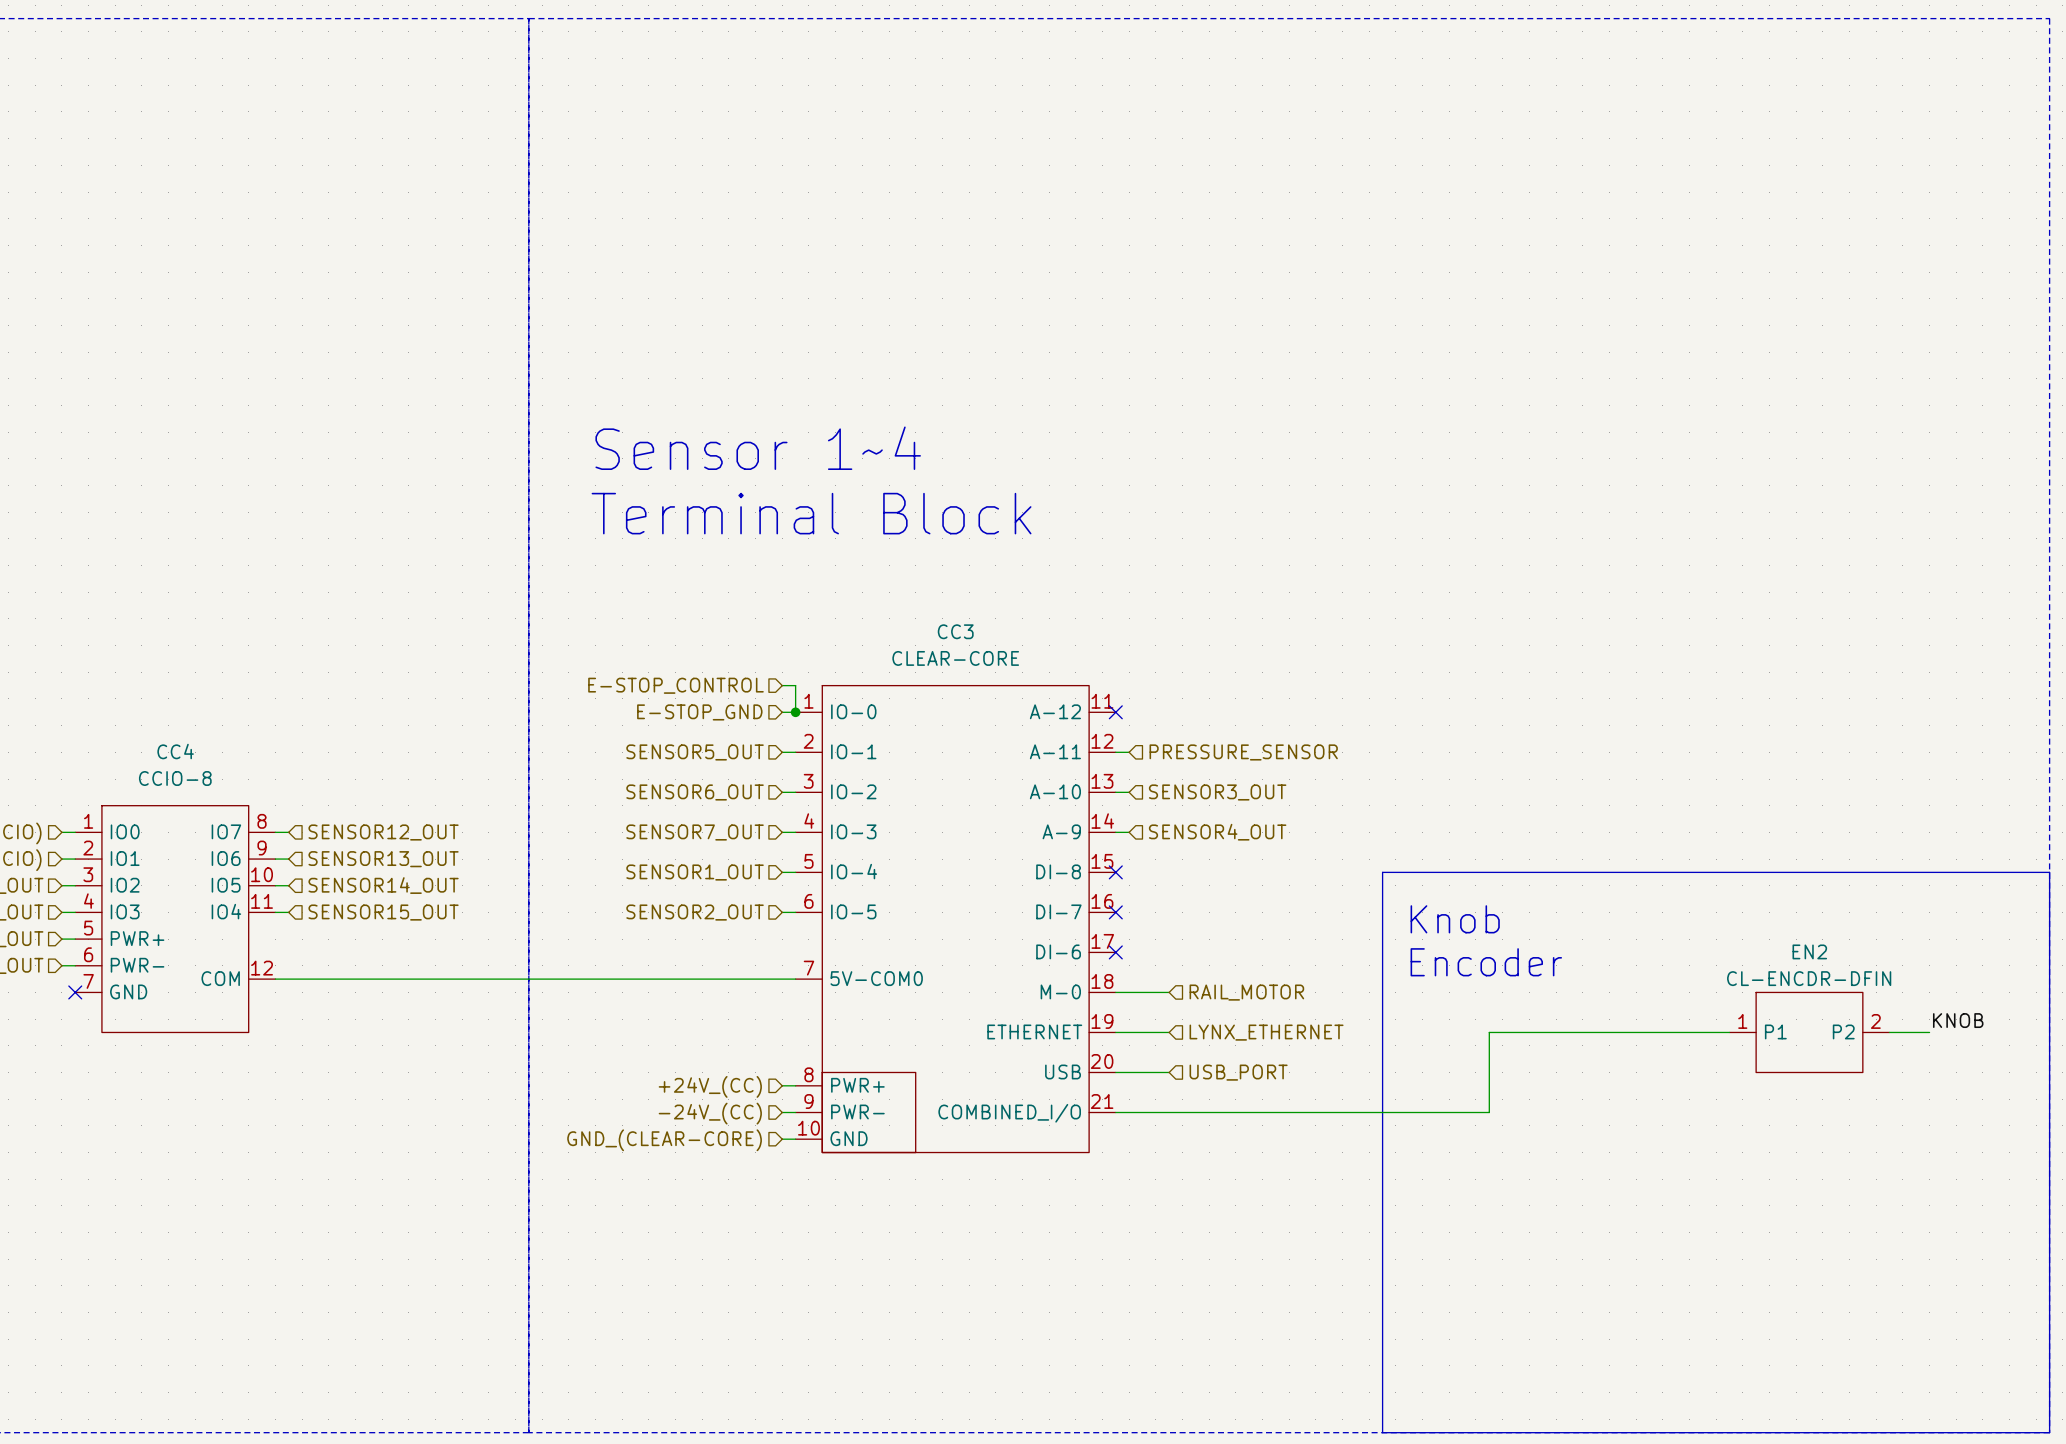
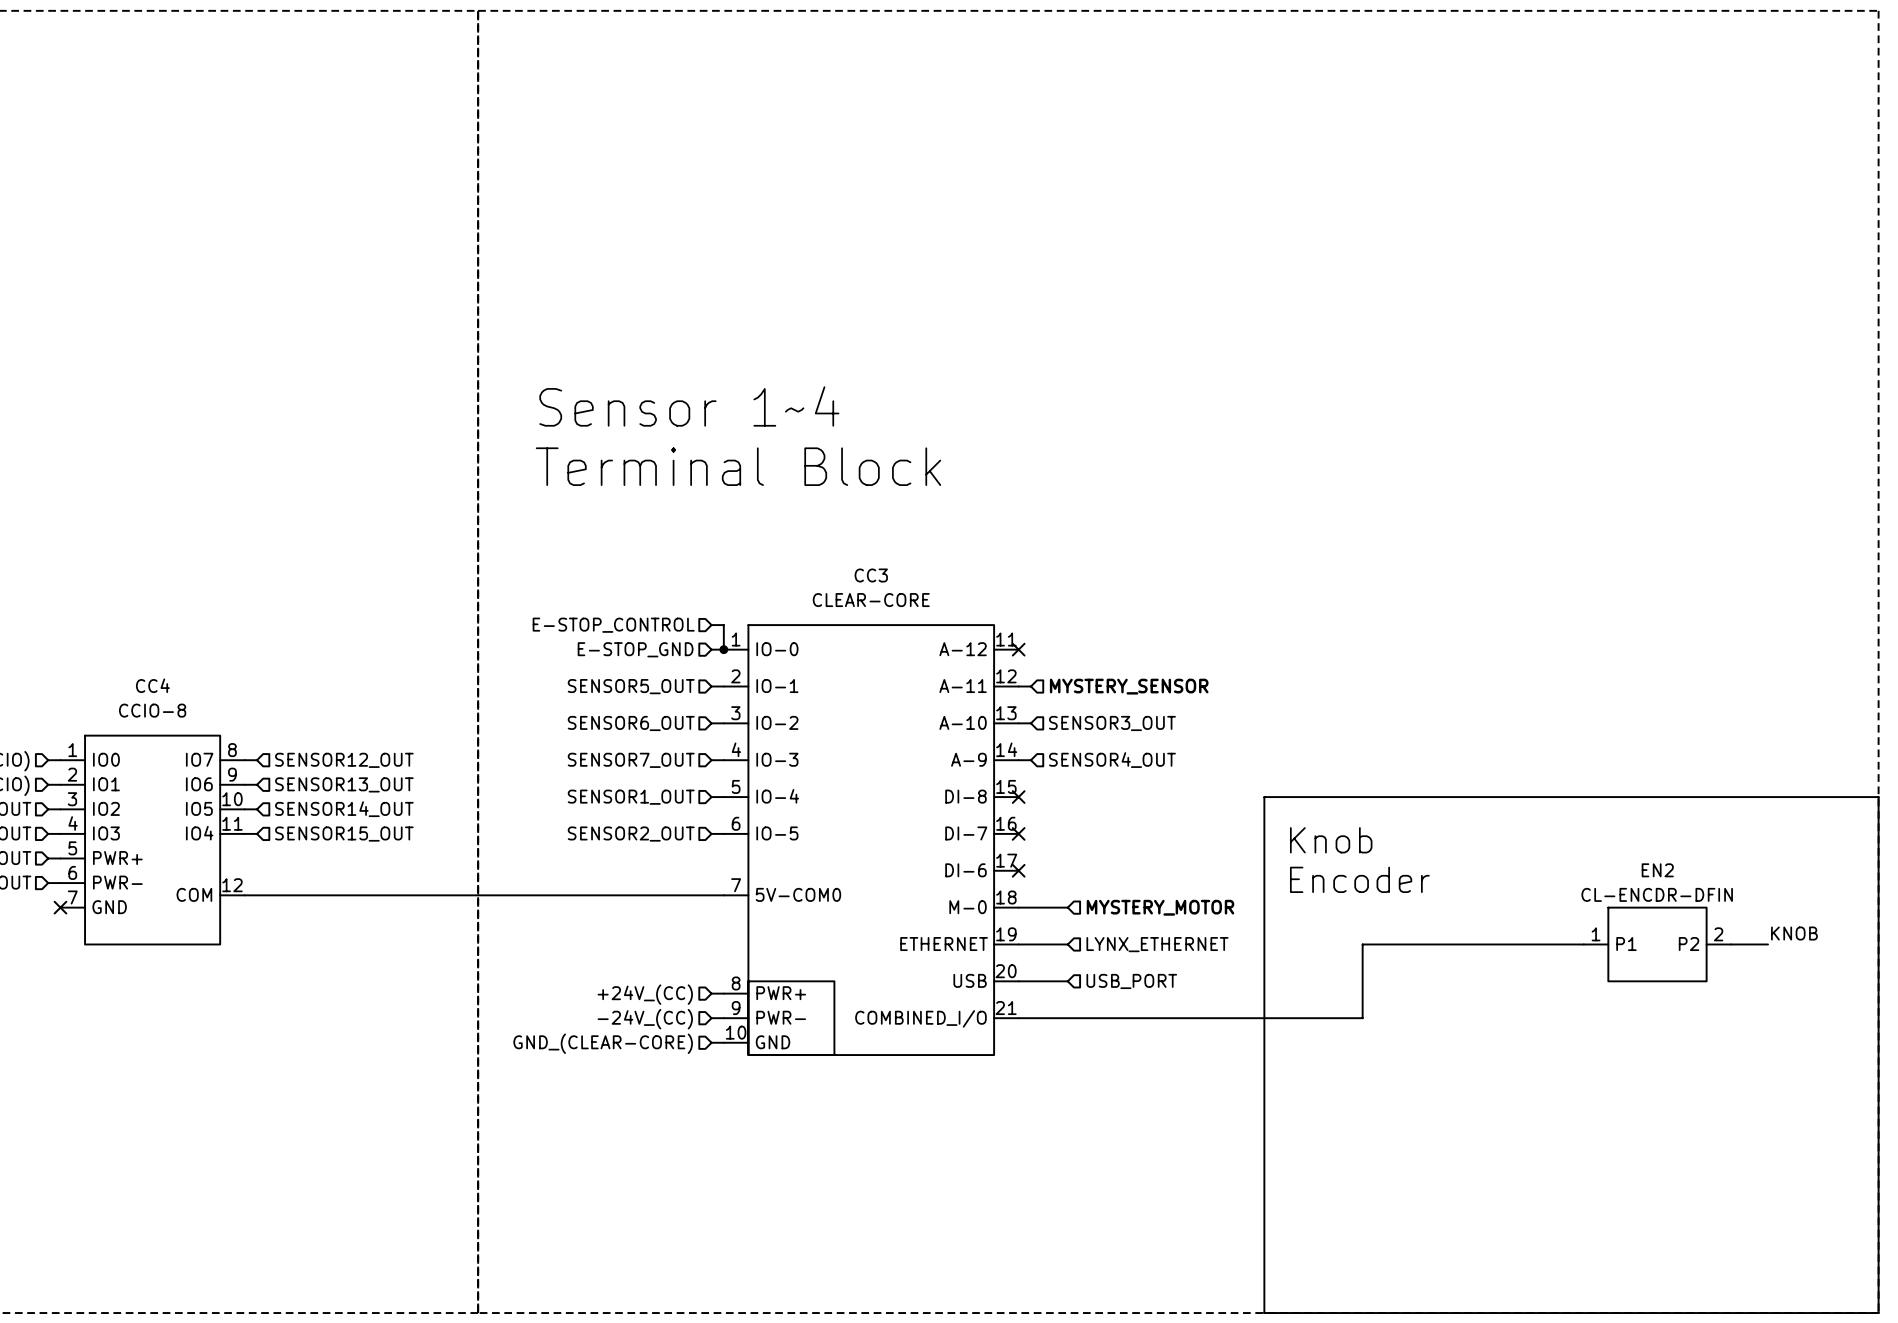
hierarchical label: PRESSURE_SENSOR (1243, 752) -> MYSTERY_SENSOR (1129, 686)
hierarchical label: RAIL_MOTOR (1246, 992) -> MYSTERY_MOTOR (1160, 907)

